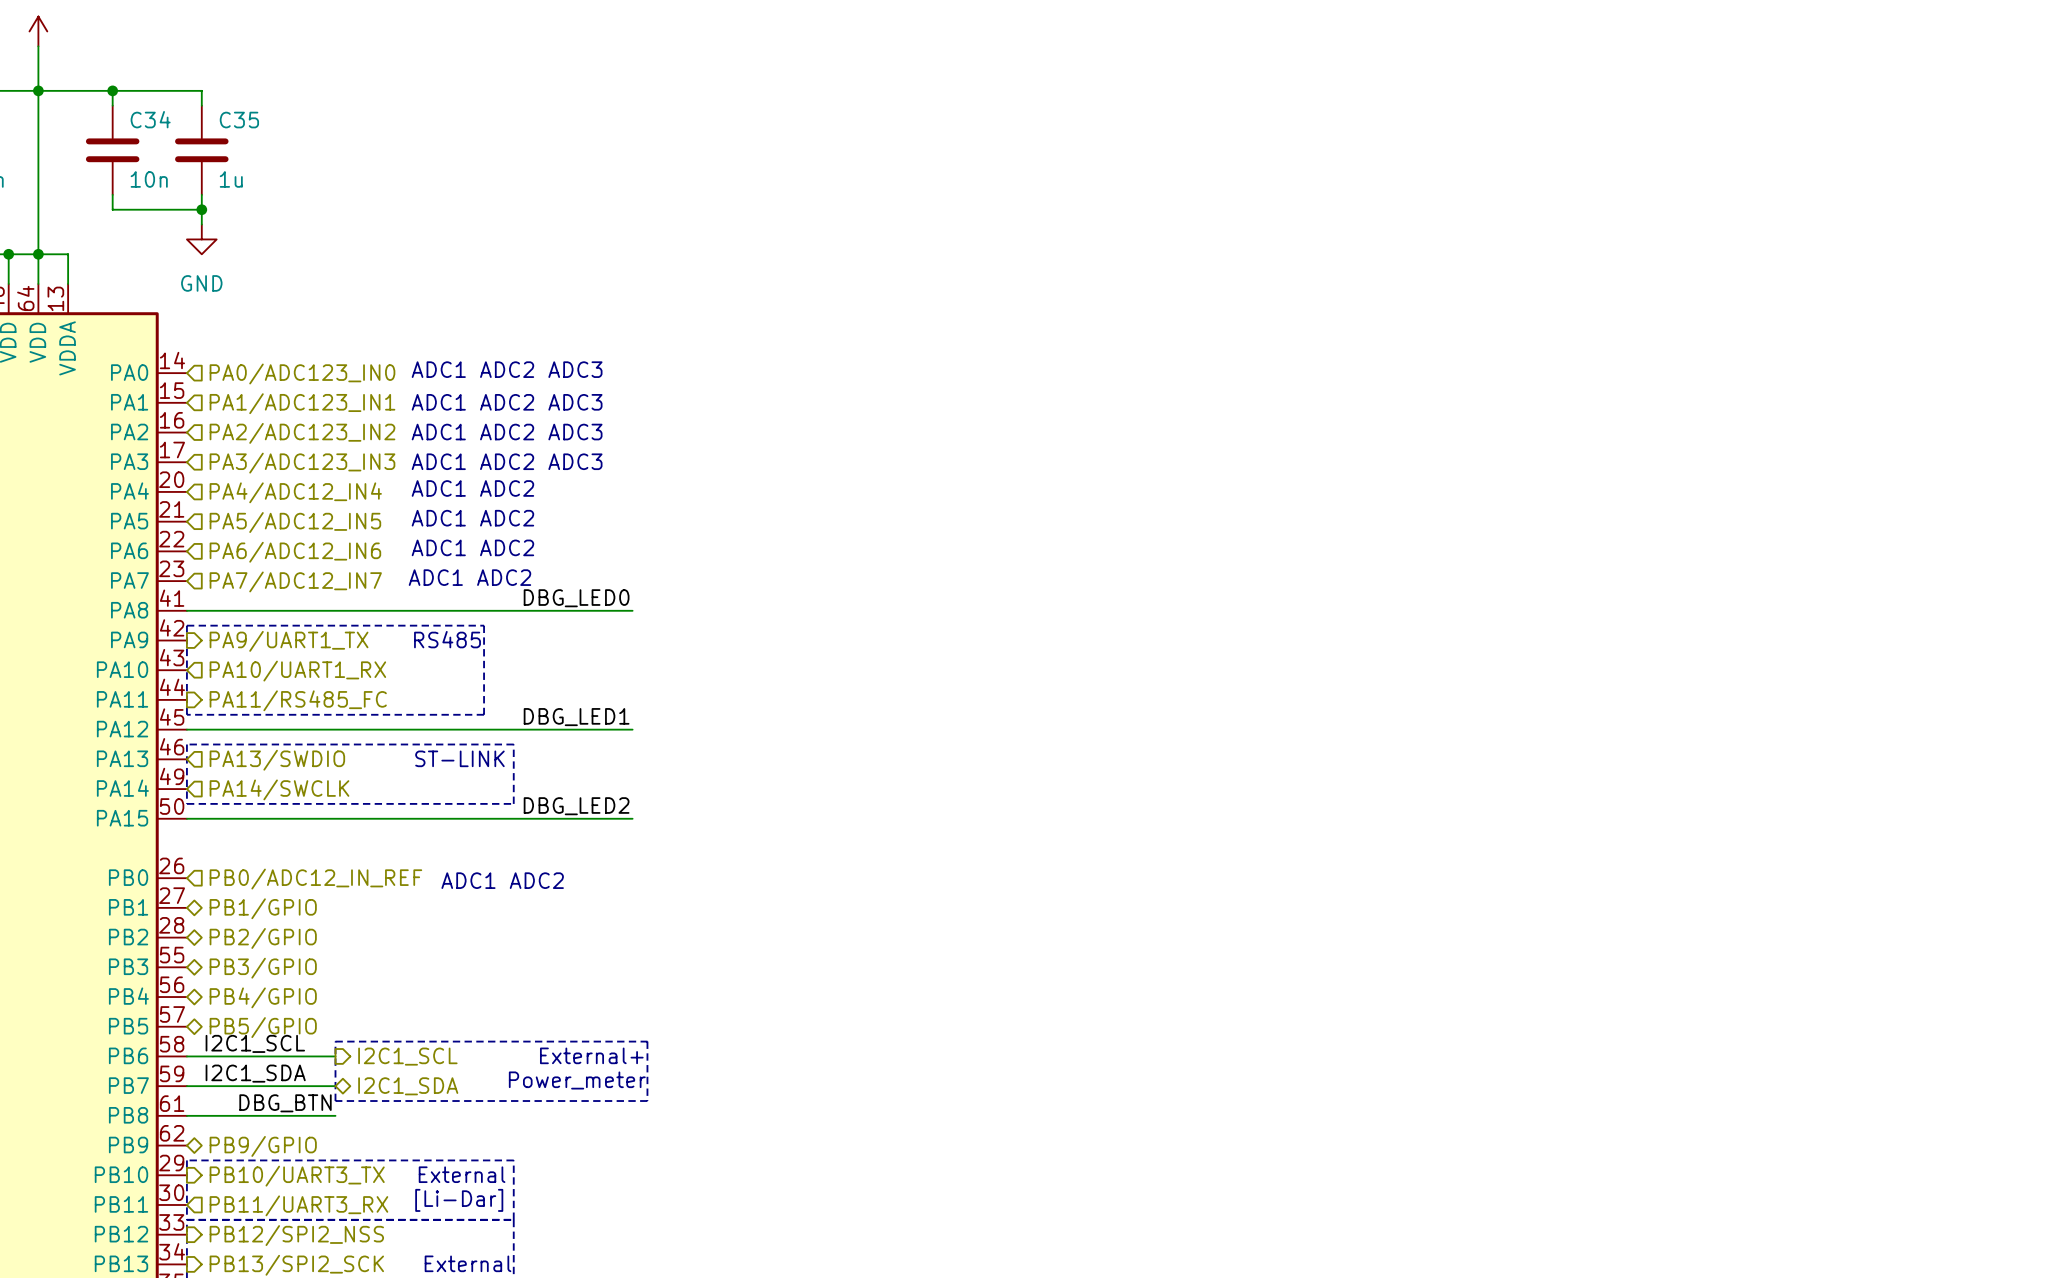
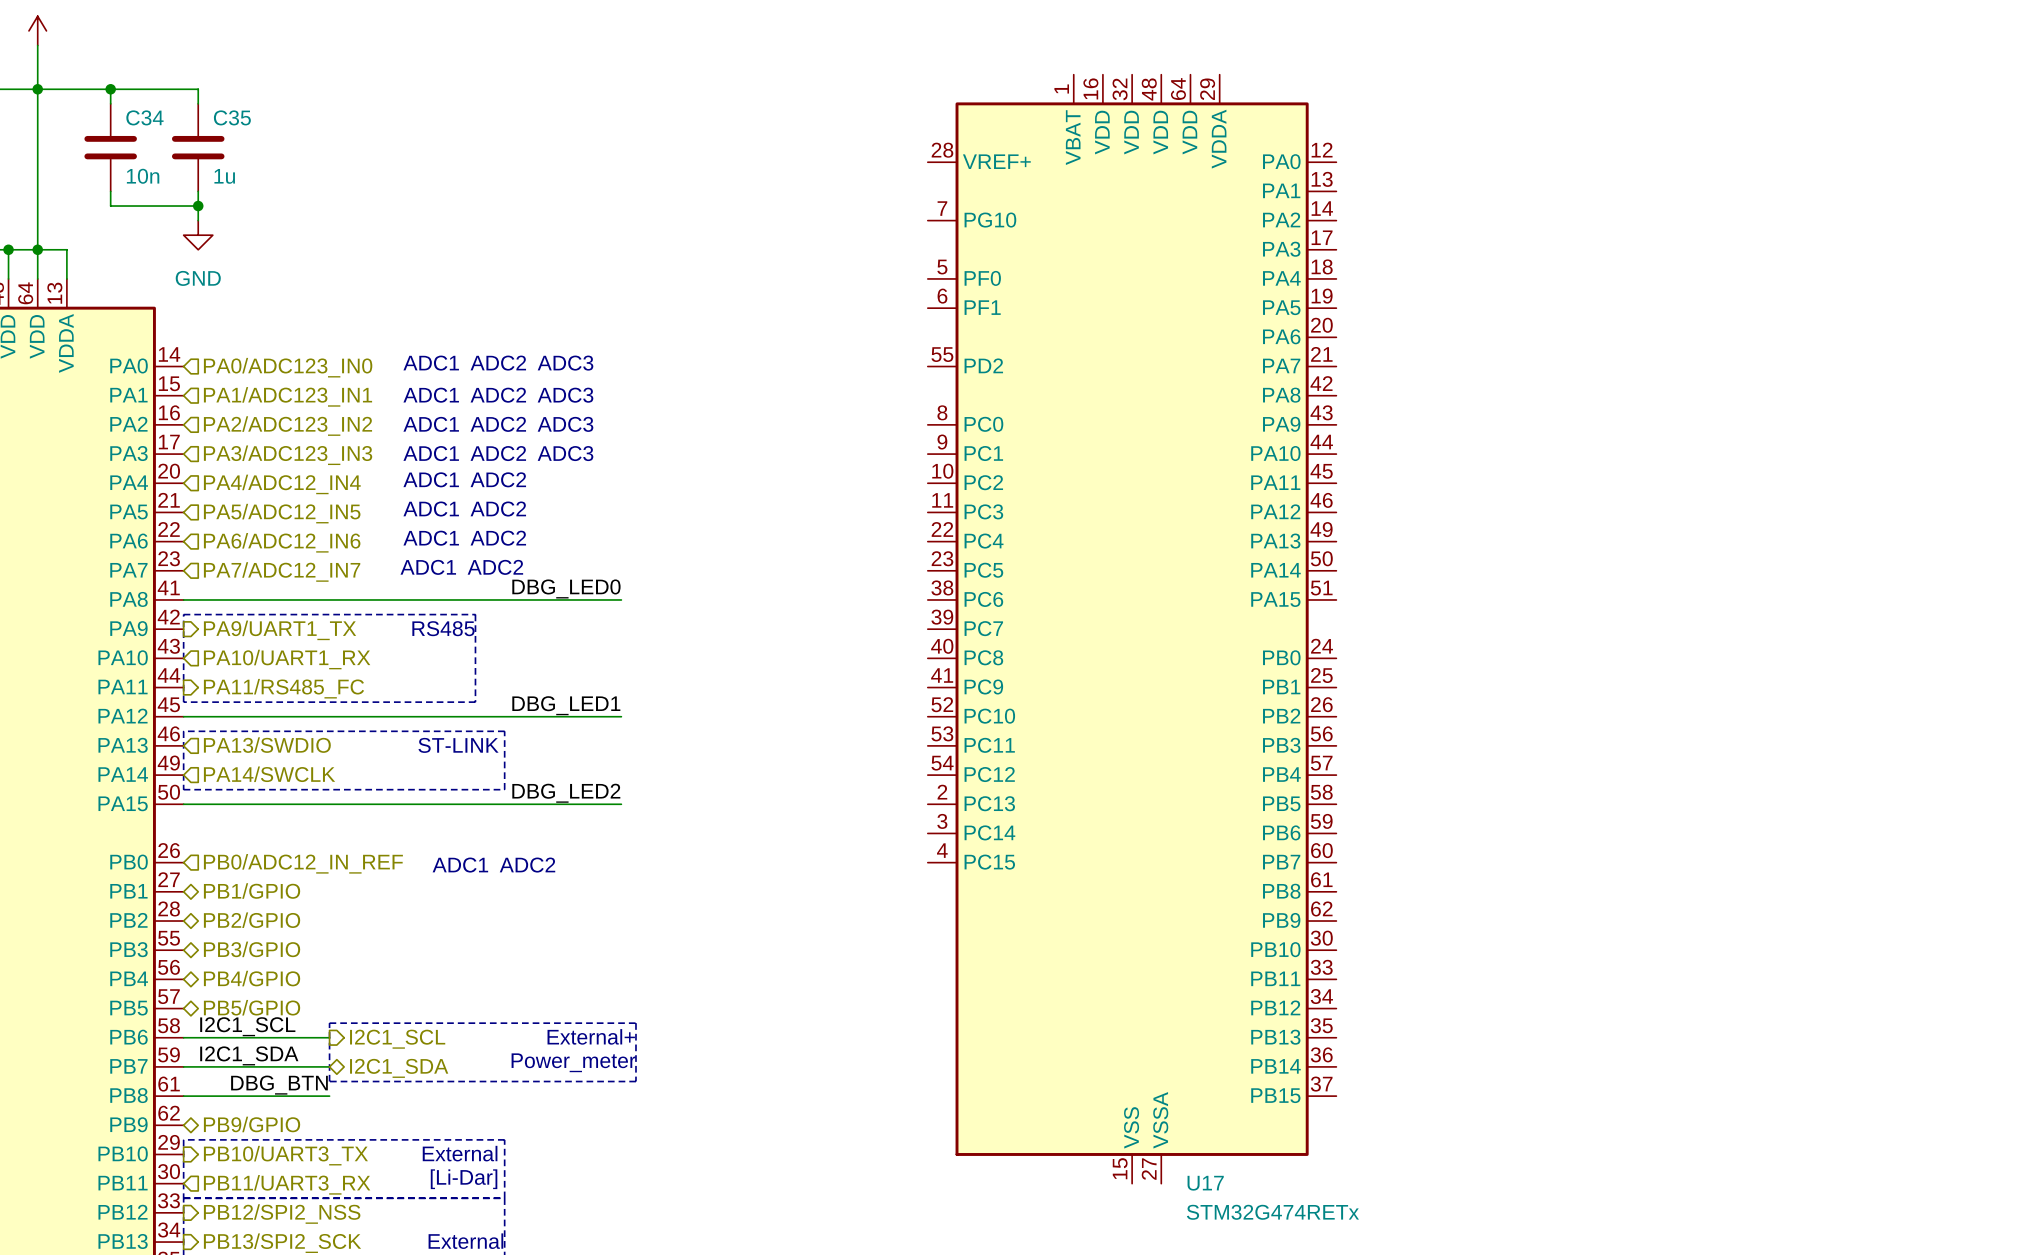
U17: none -> STM32G474RETx (1132, 629)

